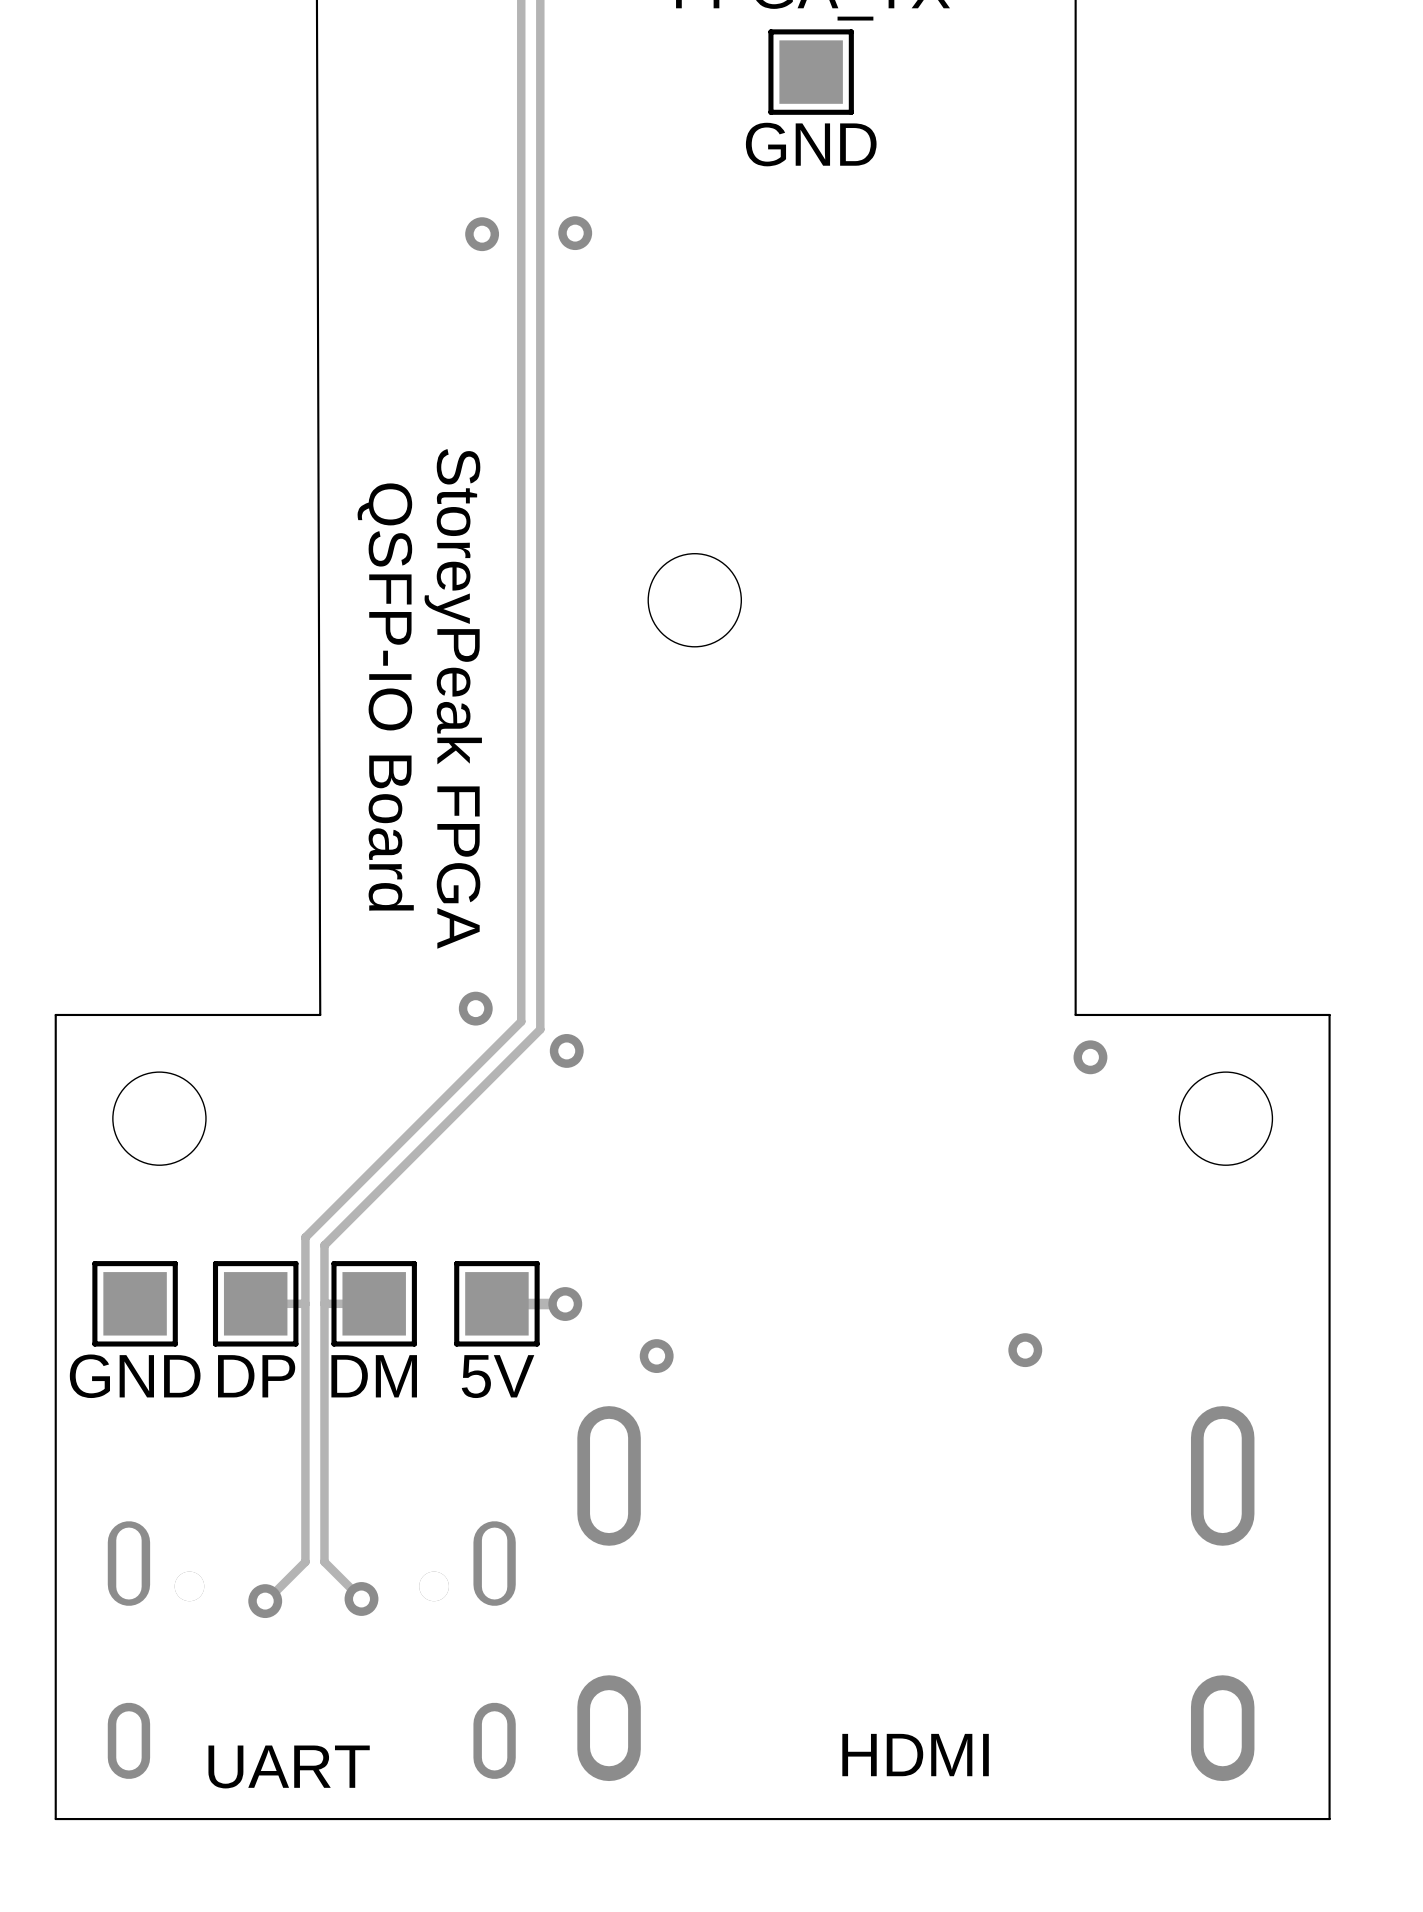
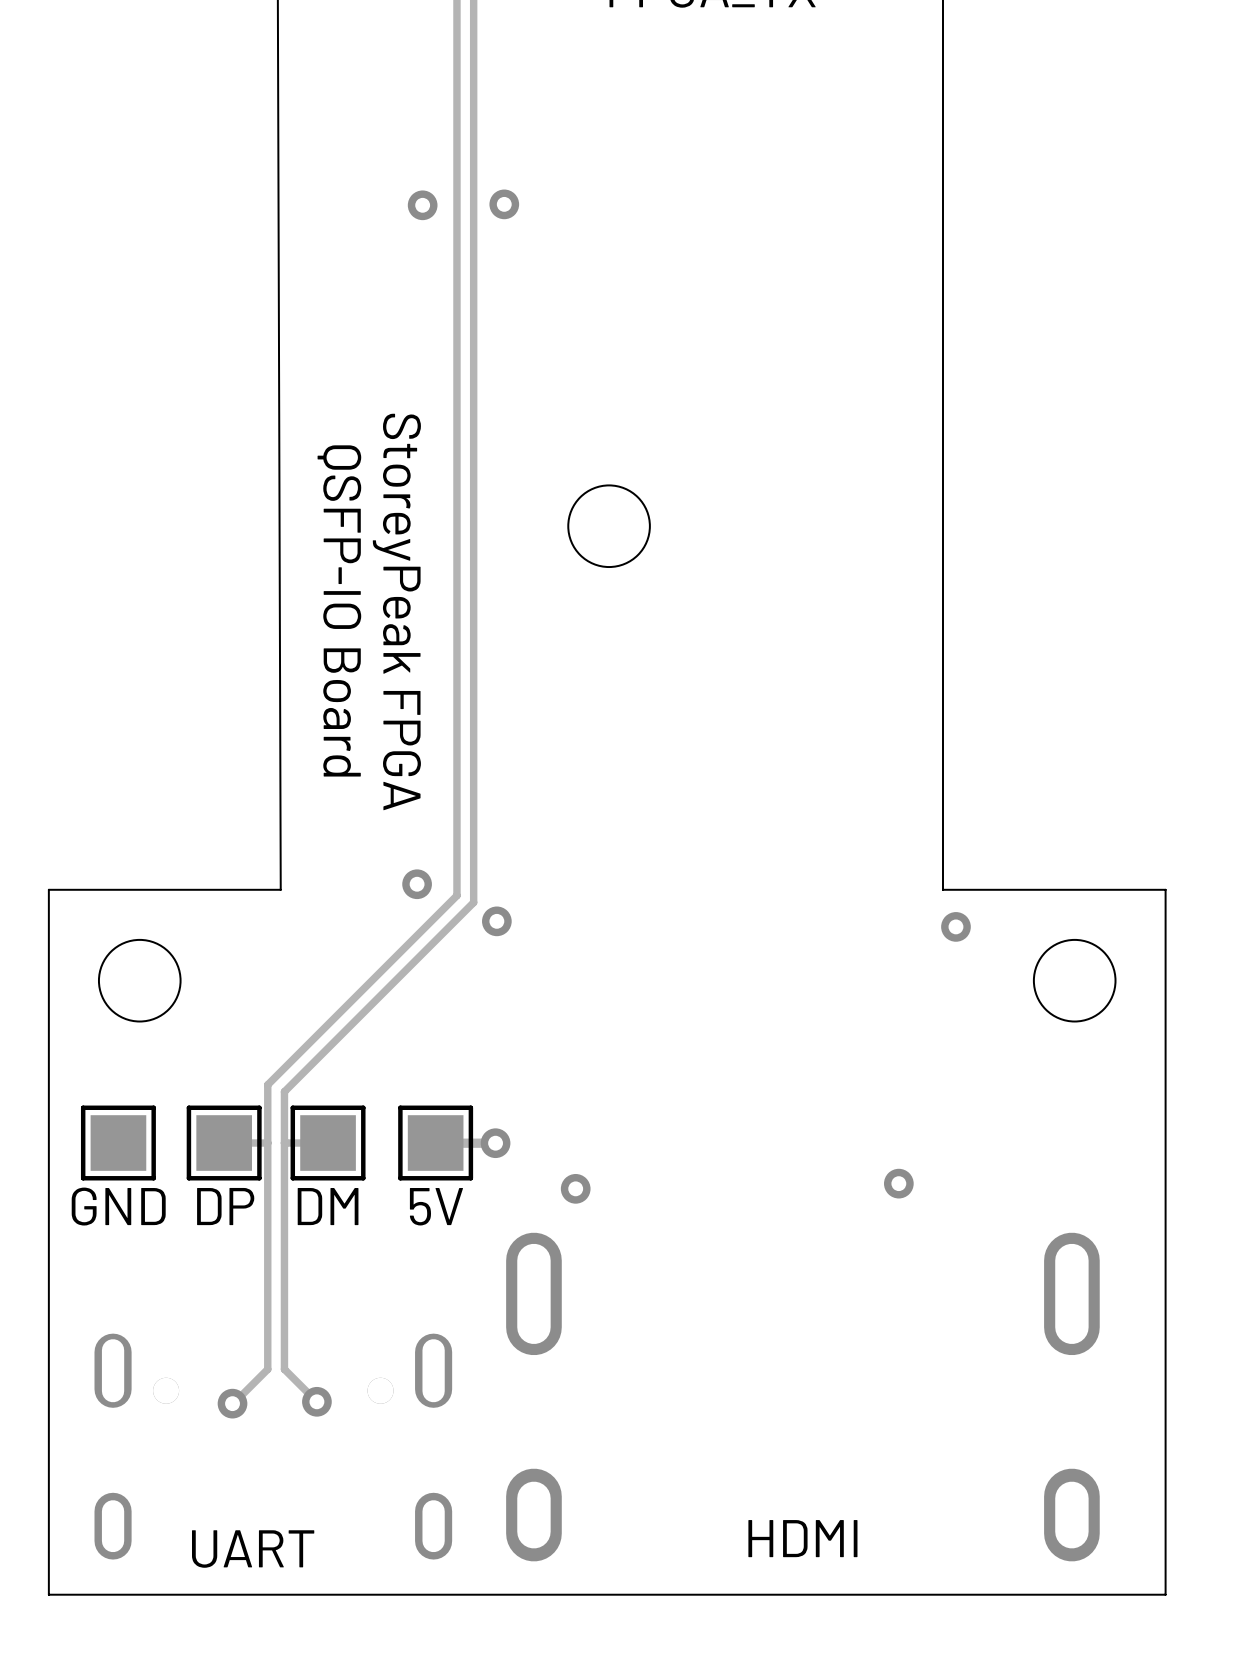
part: (811, 72) -> none
text: GND (811, 144) -> none

